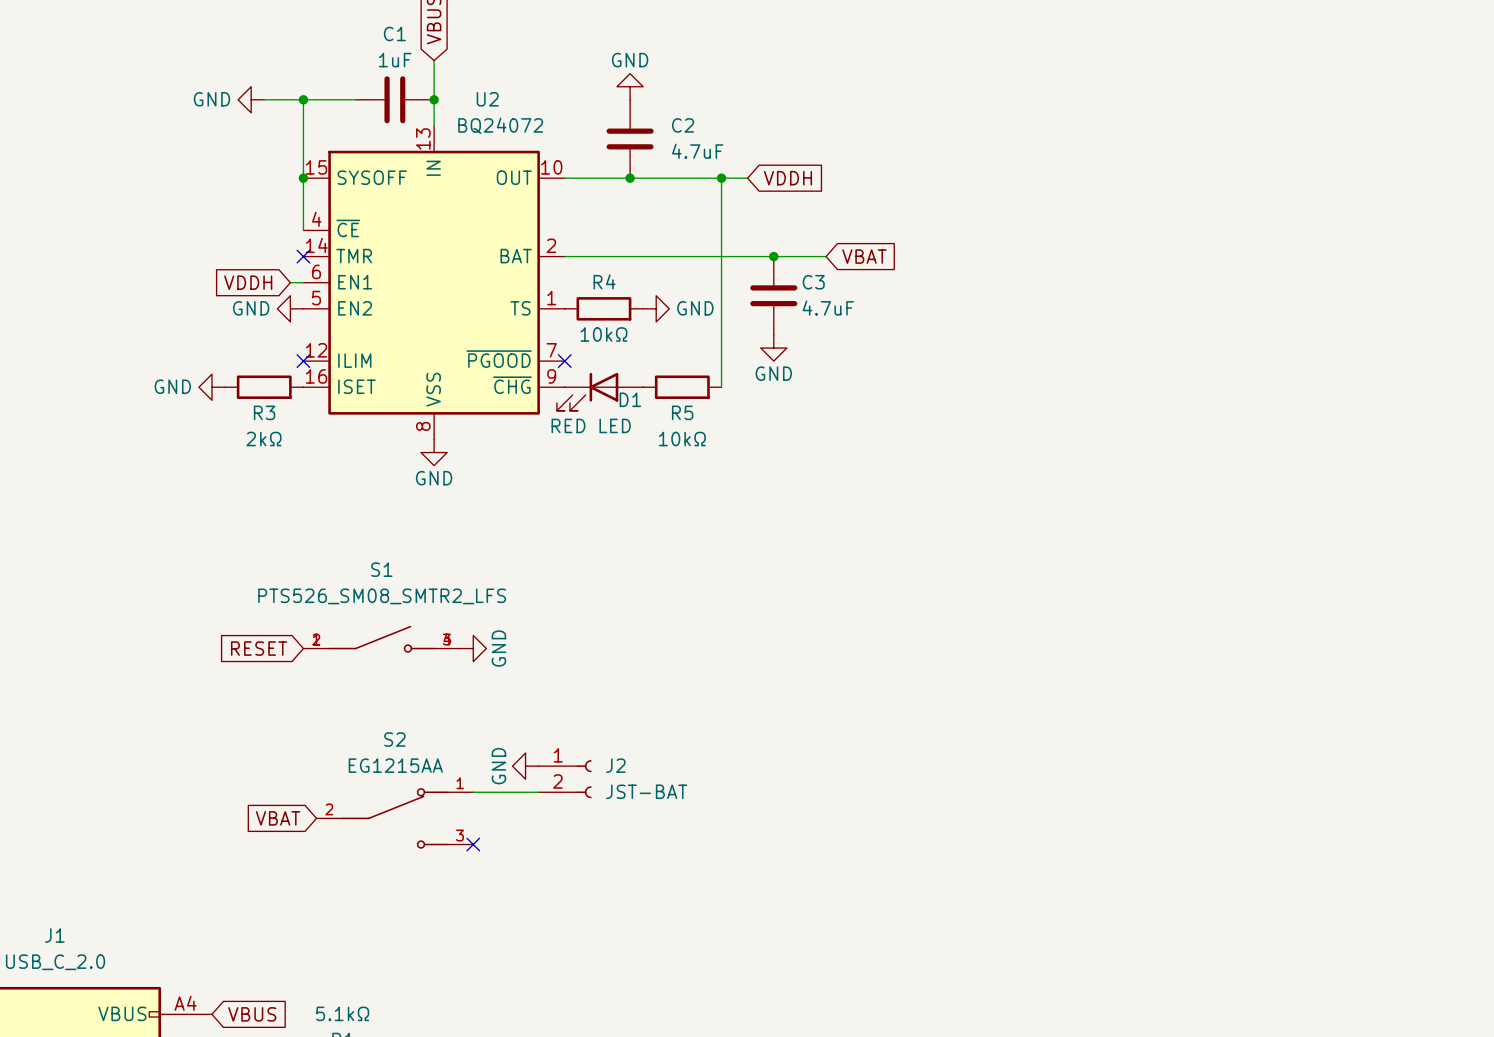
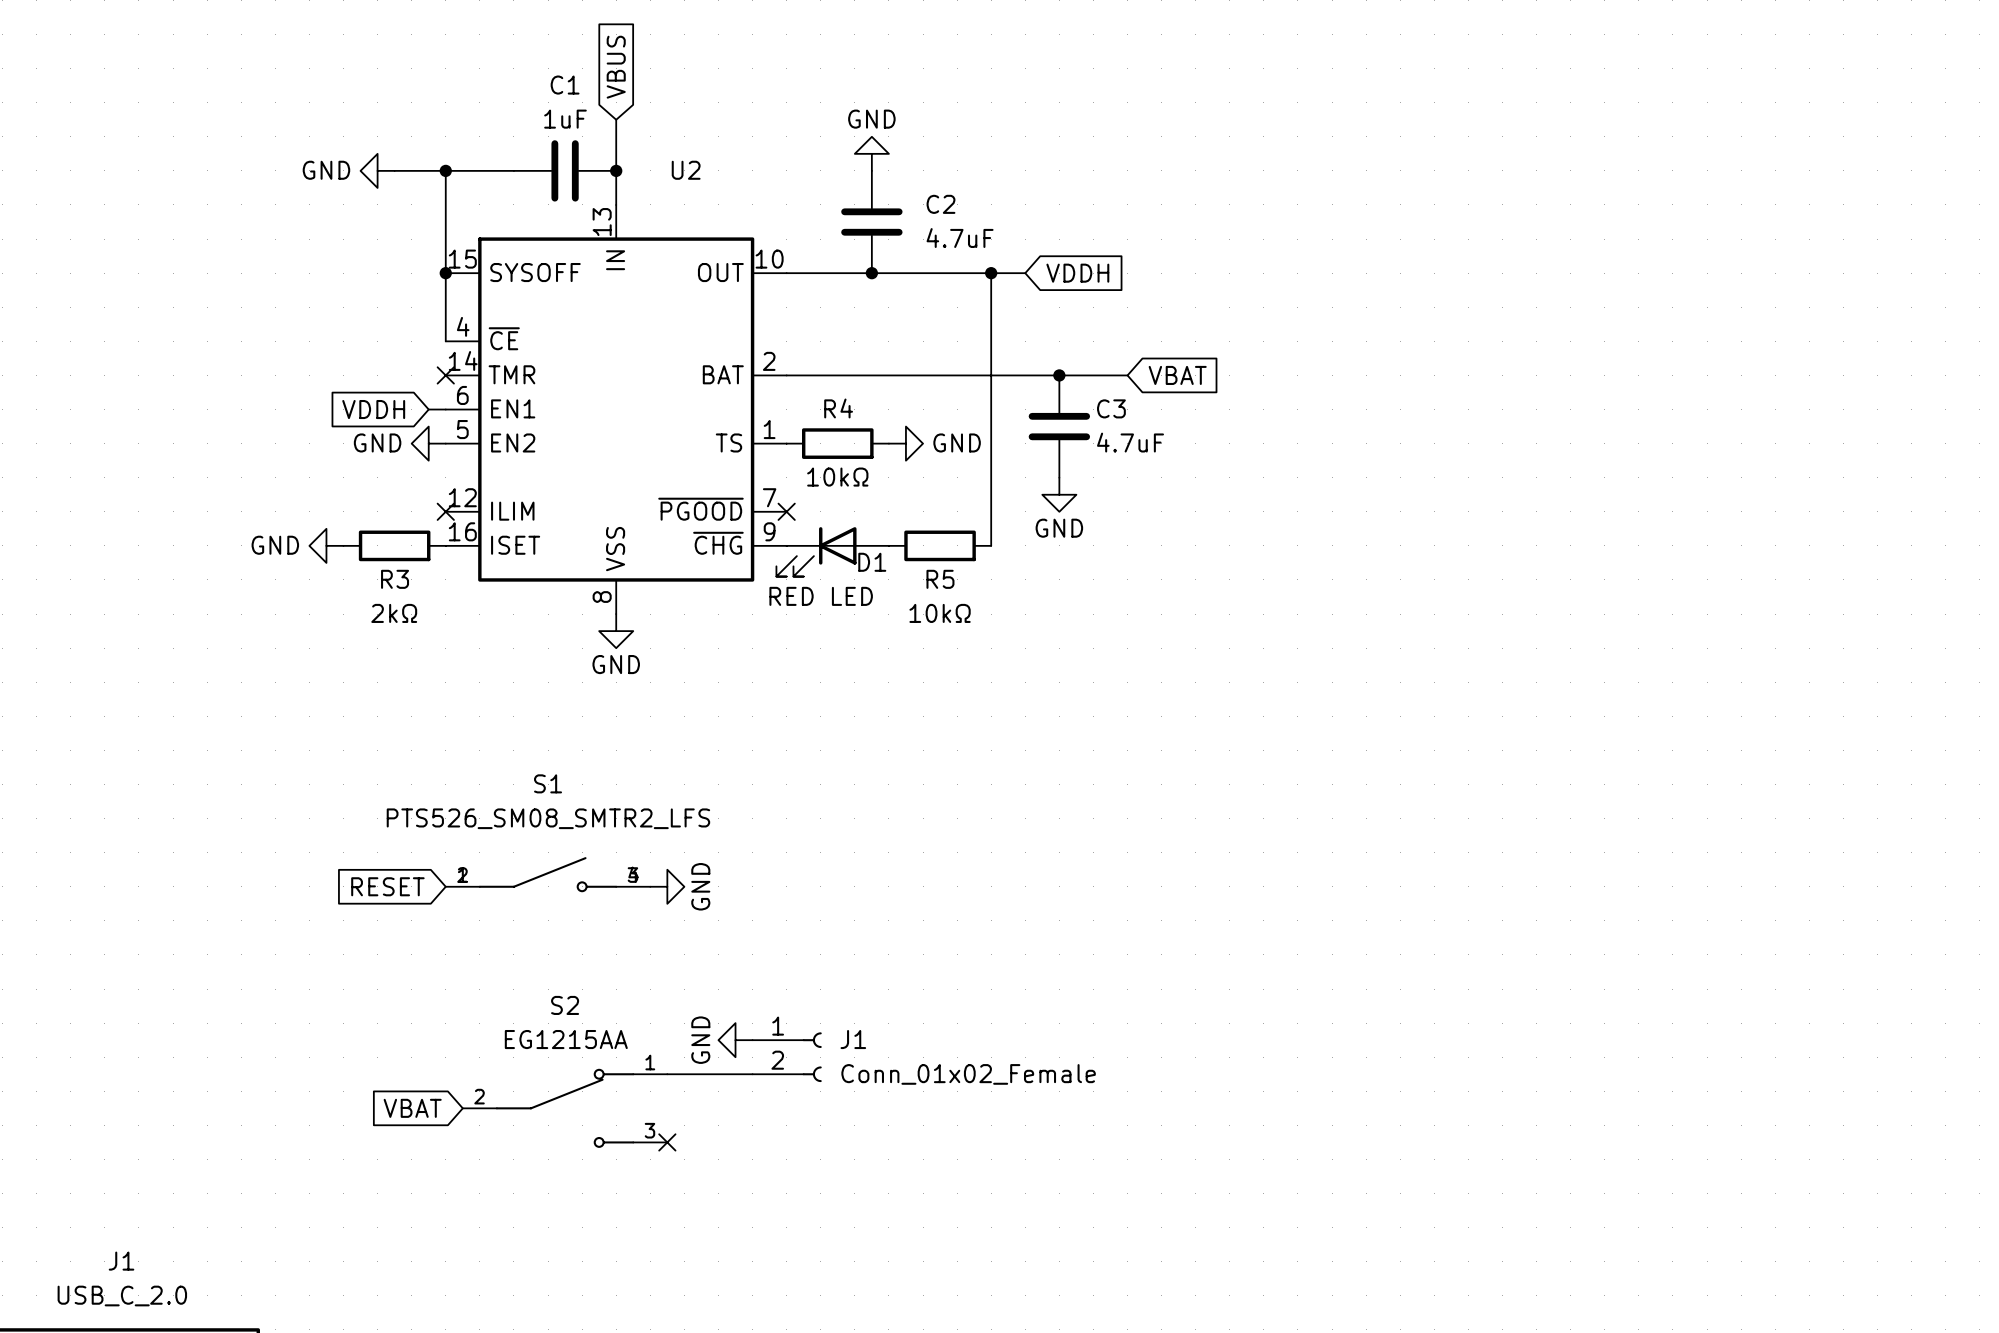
U2 value: BQ24072 (500, 125) -> none
J2 name: J2 (615, 765) -> J1 (853, 1039)
J2 value: JST-BAT (646, 791) -> Conn_01x02_Female (968, 1074)

